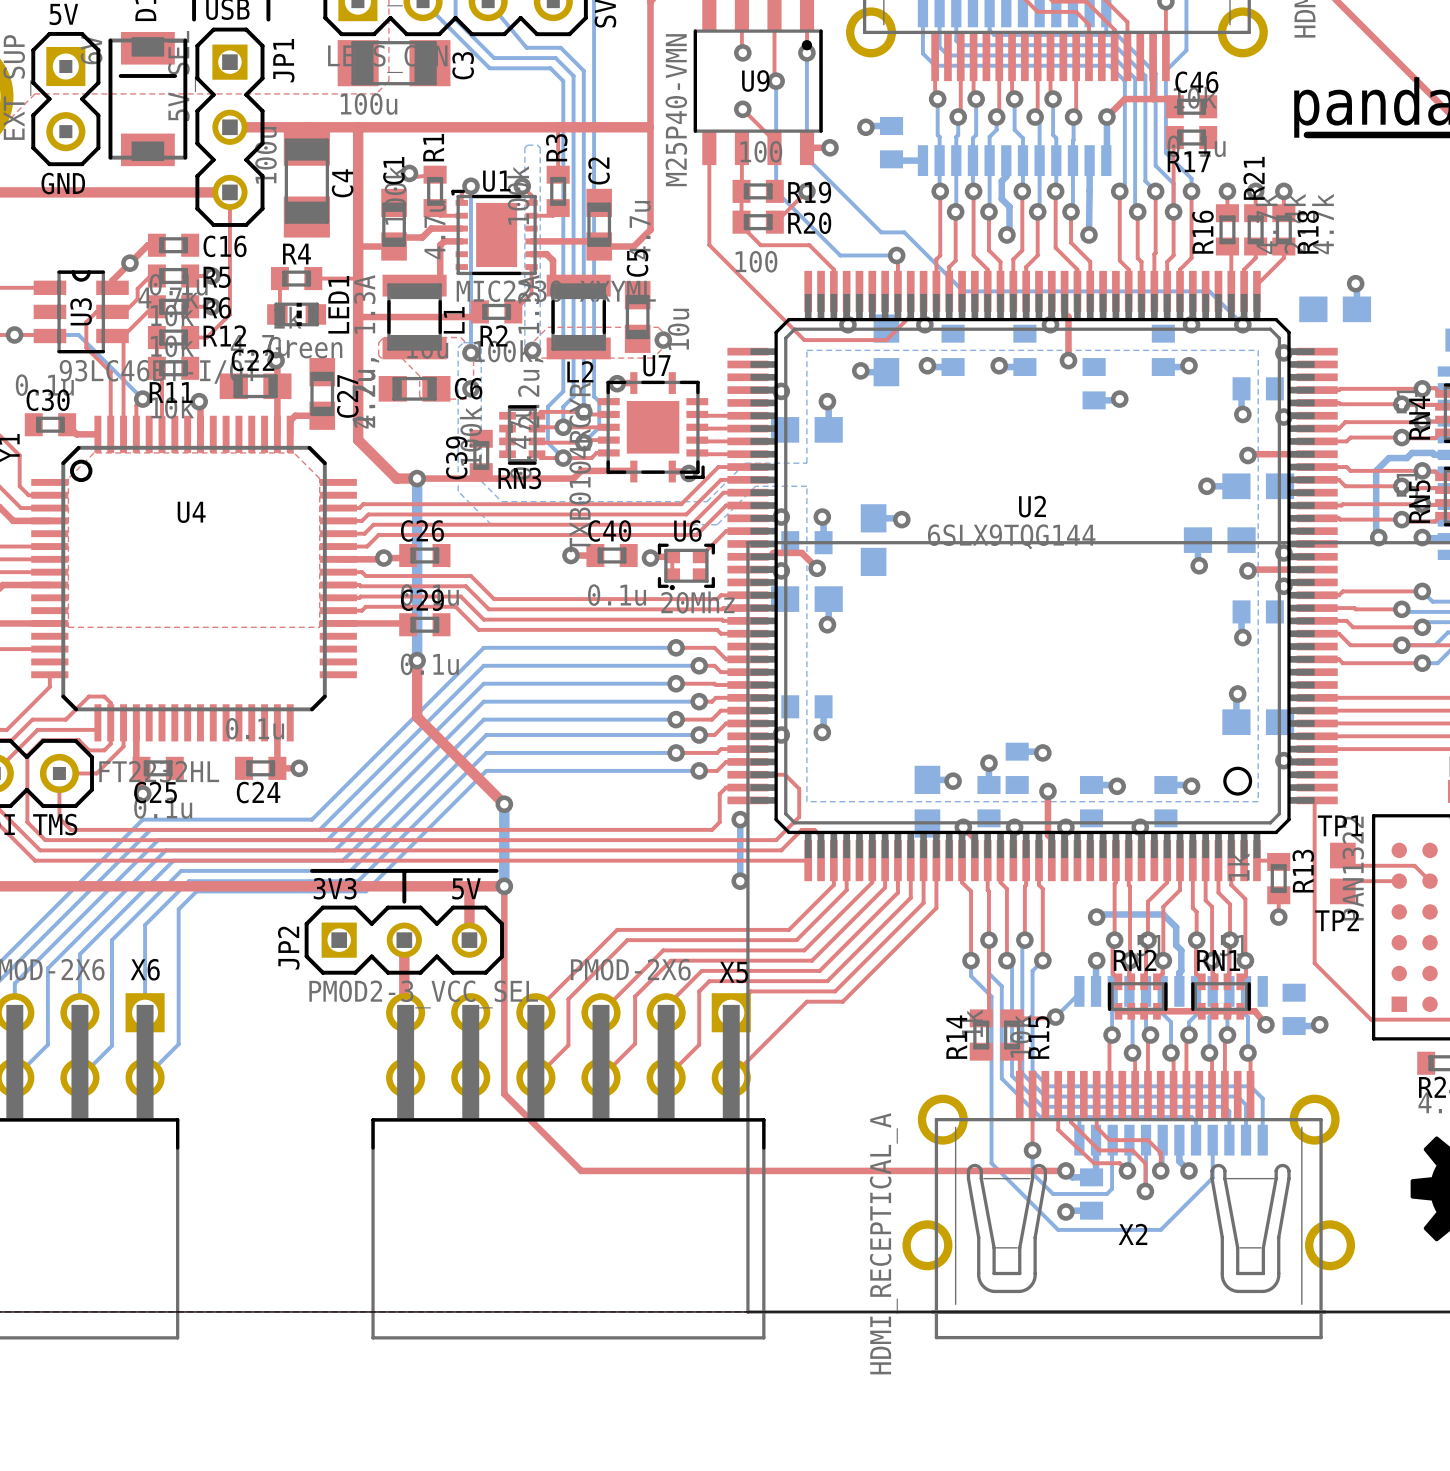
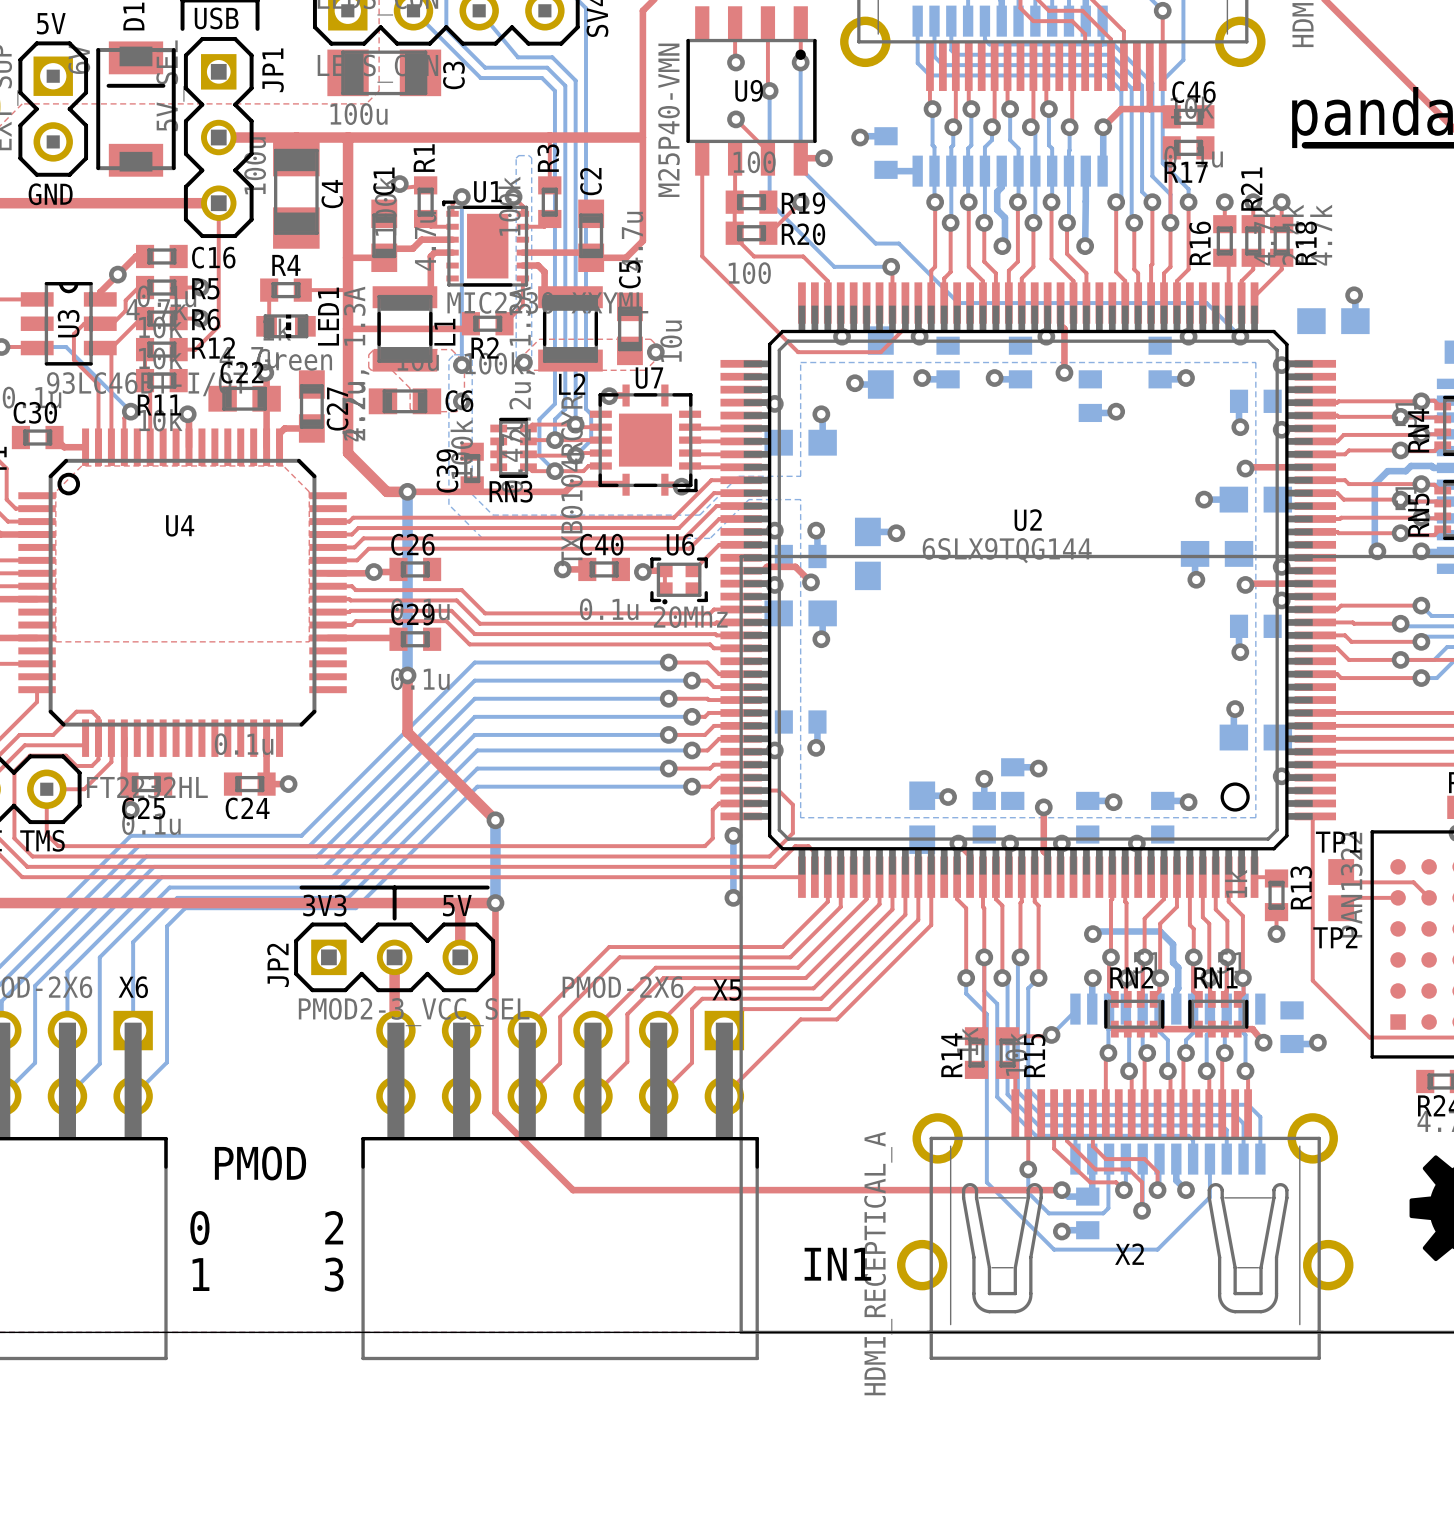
text: none -> PMOD (260, 1163)
text: none -> 0 (199, 1228)
text: none -> 2 (334, 1227)
text: none -> IN1 (837, 1264)
text: none -> 1 (200, 1274)
text: none -> 3 (334, 1274)

